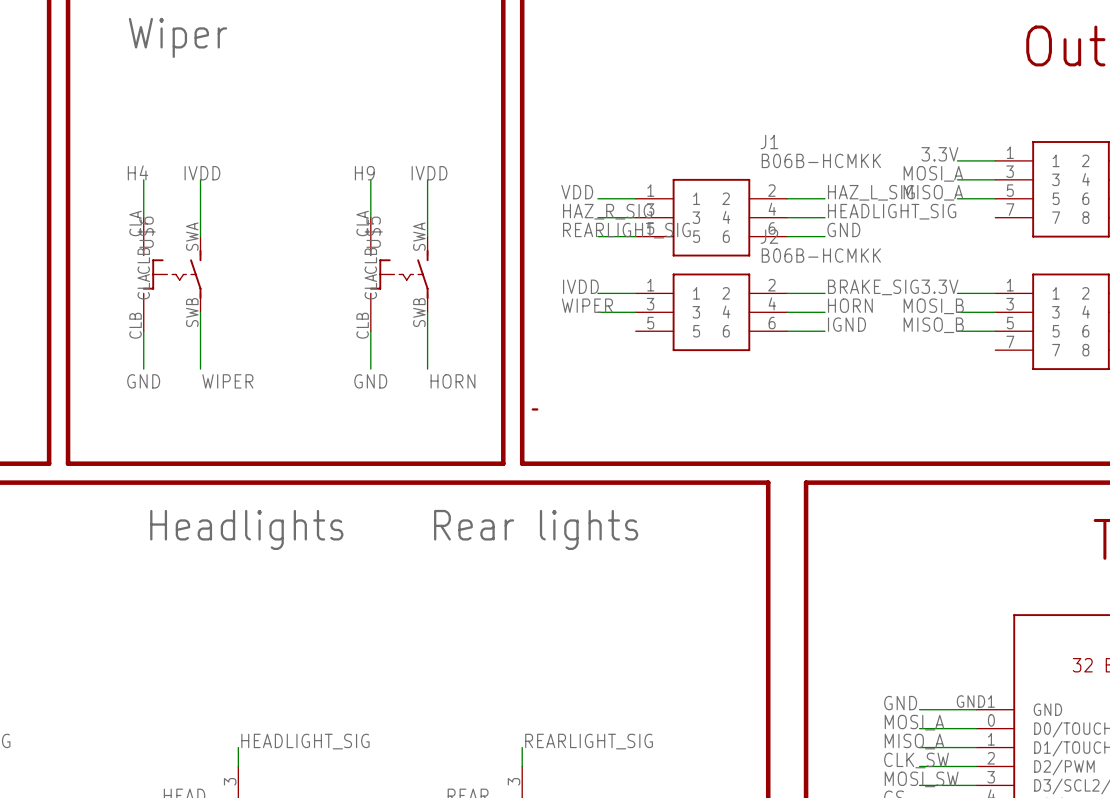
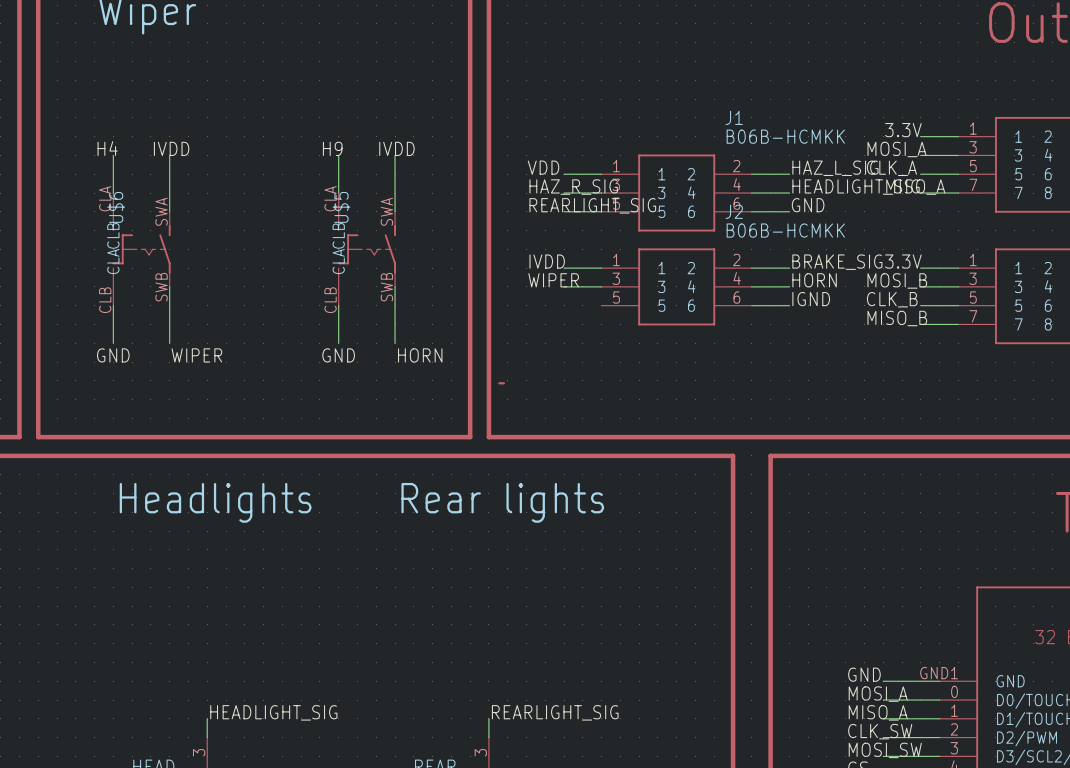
label: MISO_A (933, 192) -> CLK_A (891, 168)
label: none -> MISO_A (915, 187)
wire: none -> (920, 193) (958, 193)
label: MISO_B (933, 325) -> CLK_B (892, 299)
label: none -> MISO_B (897, 318)
wire: none -> (920, 324) (958, 324)

